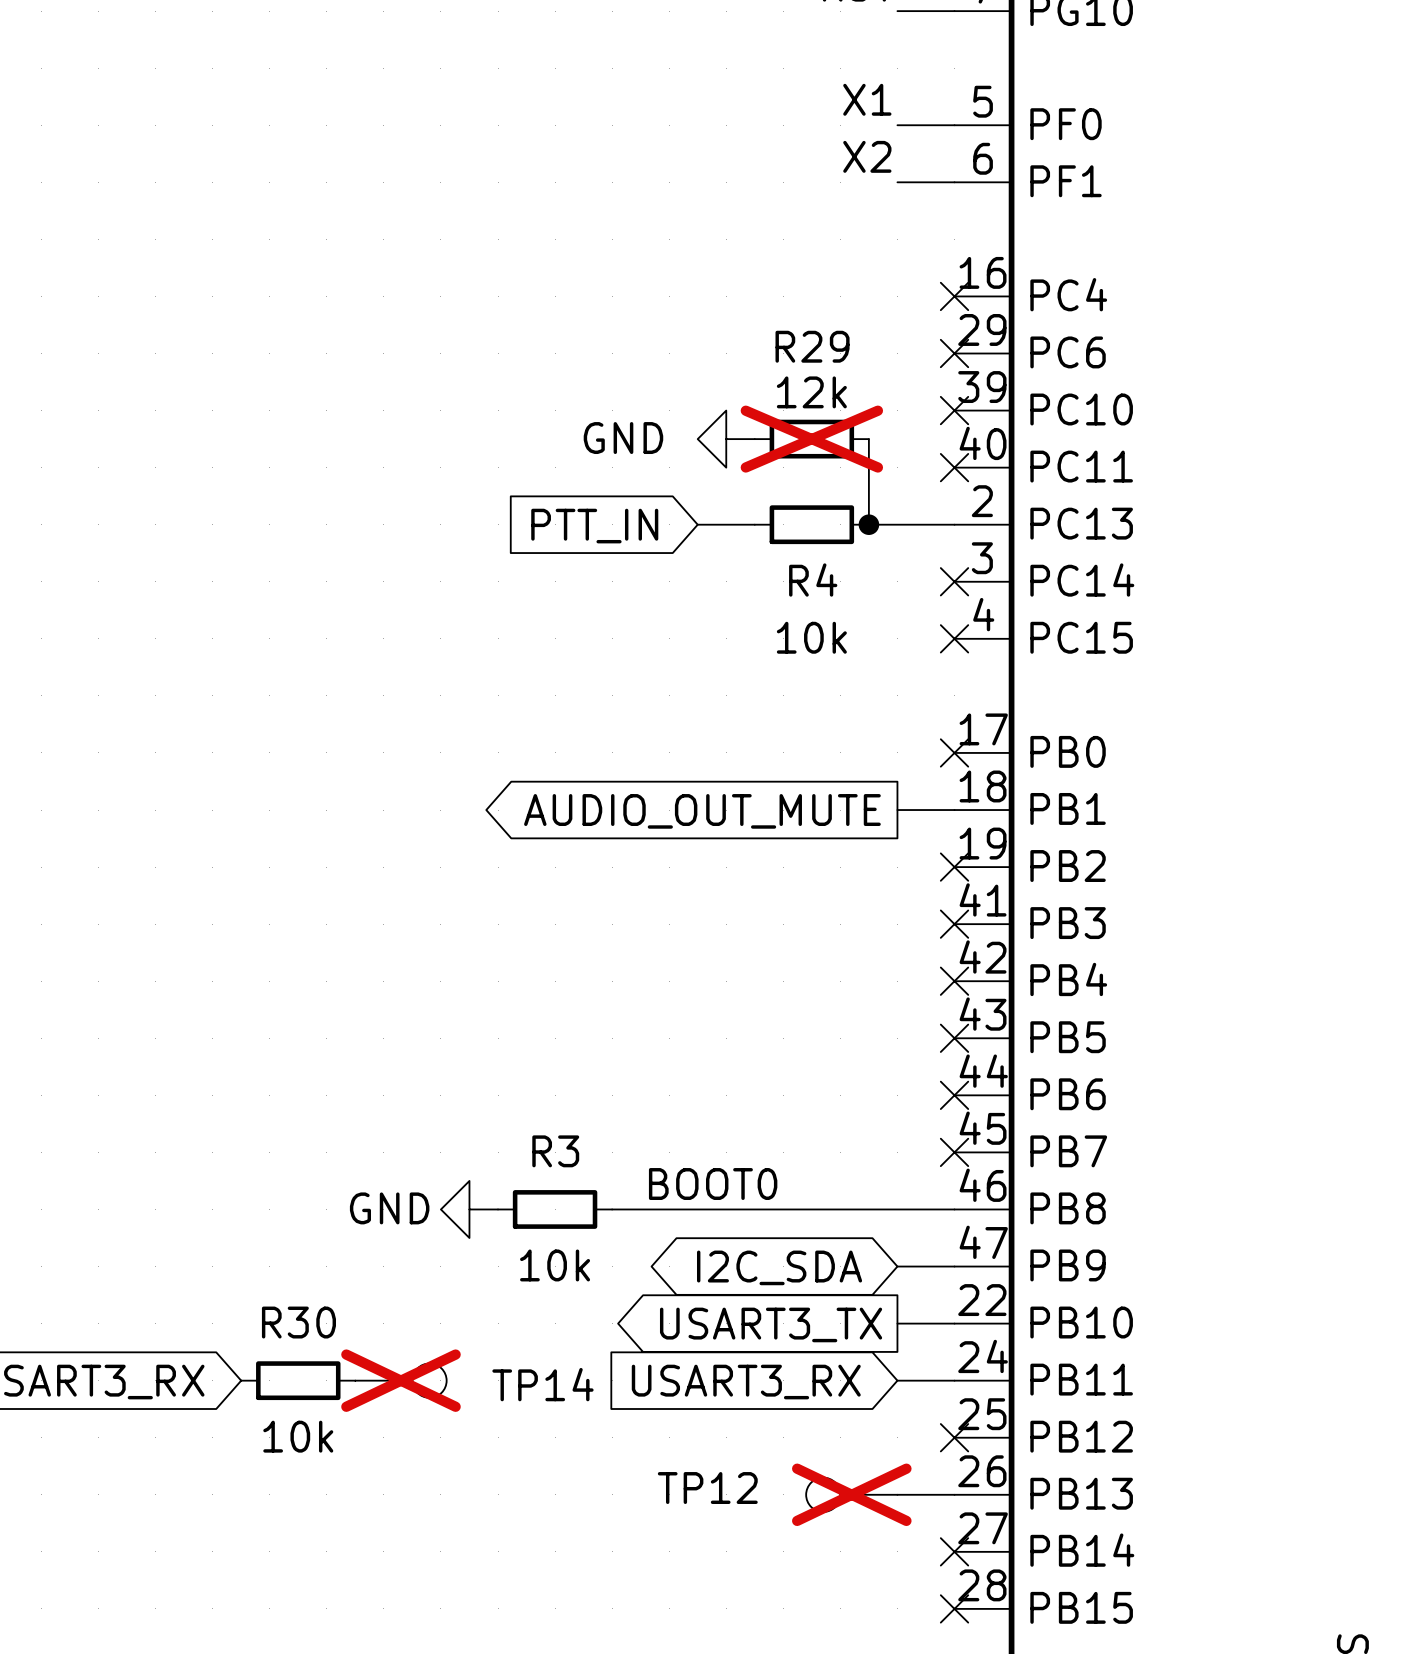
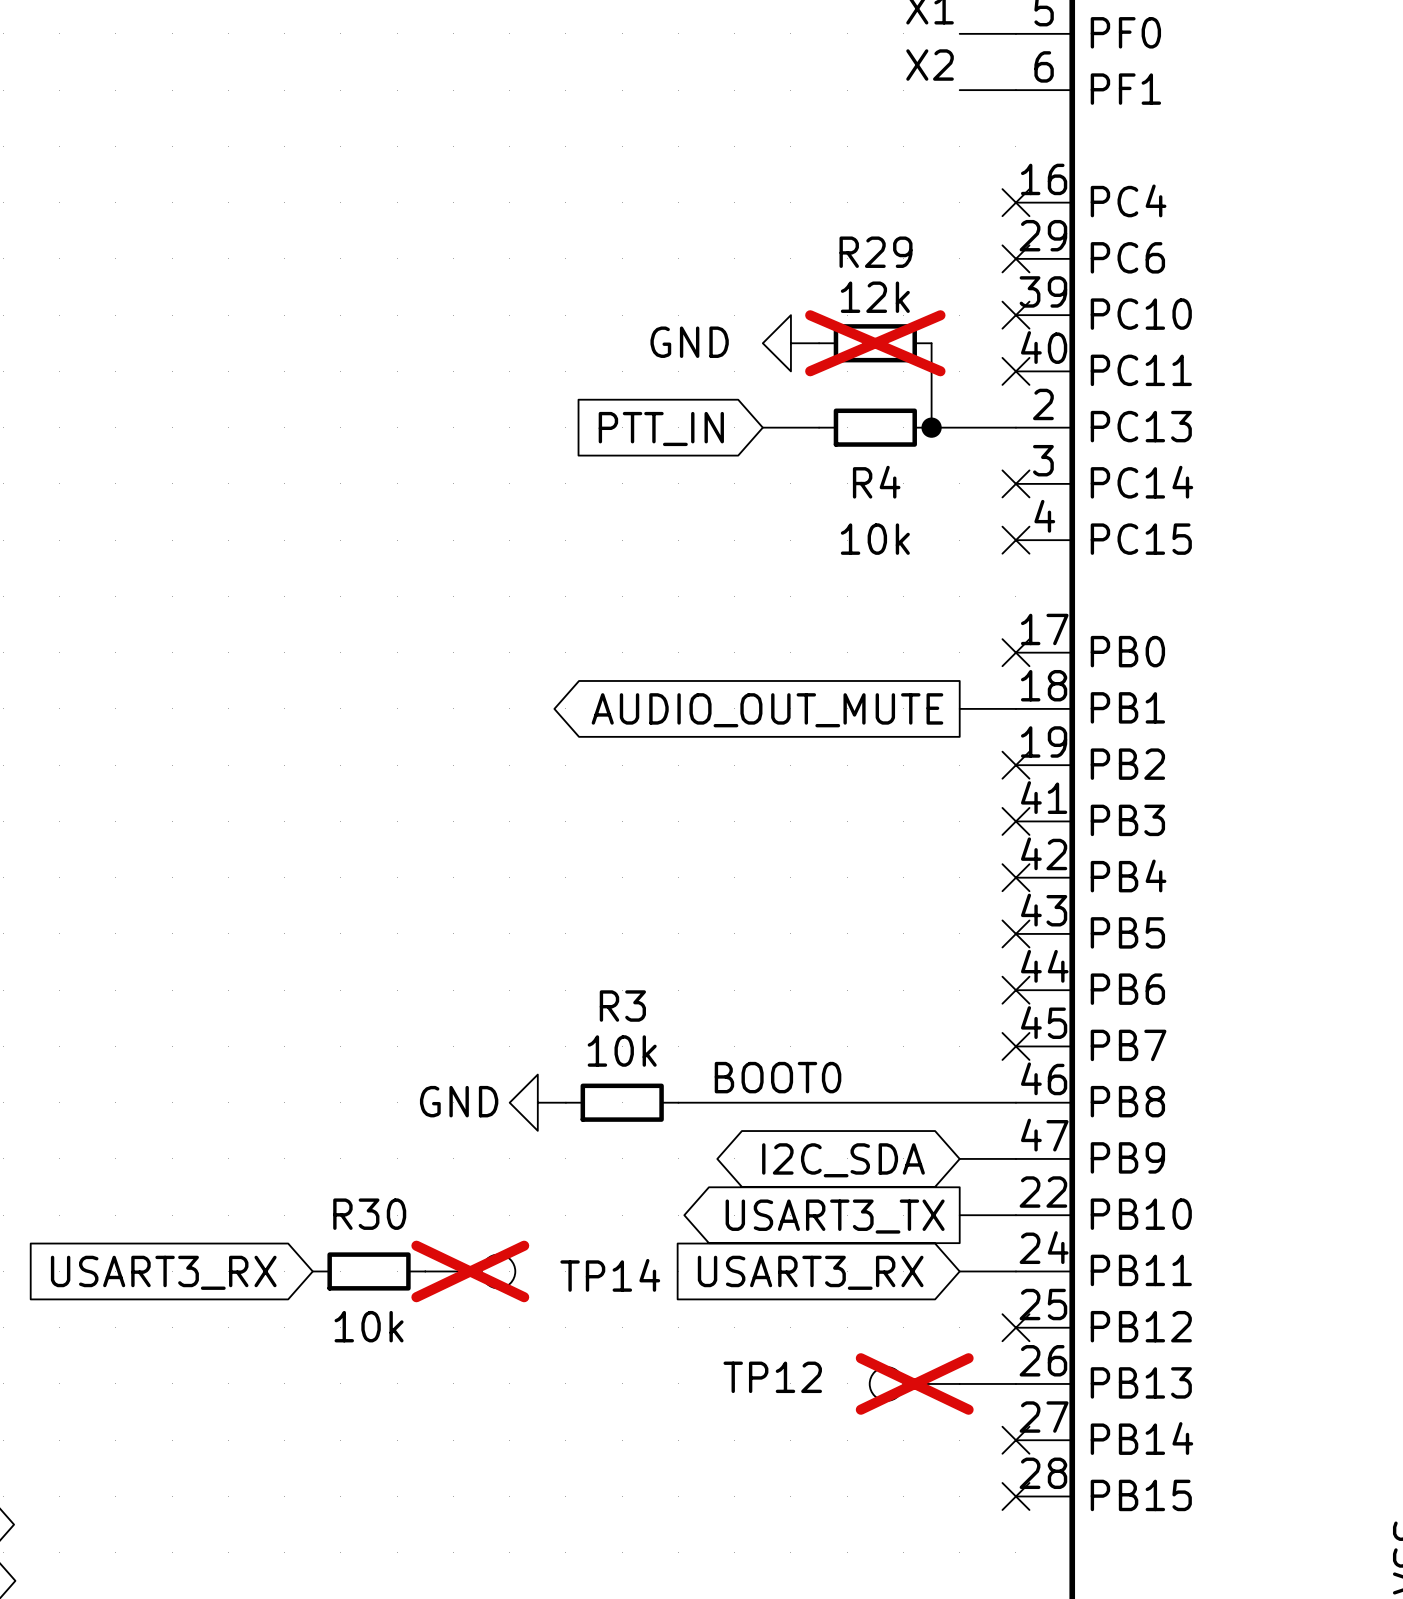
R3 name position: R3 (555, 1151) -> R3 (622, 1006)
R3 value position: 10k (555, 1265) -> 10k (622, 1051)

